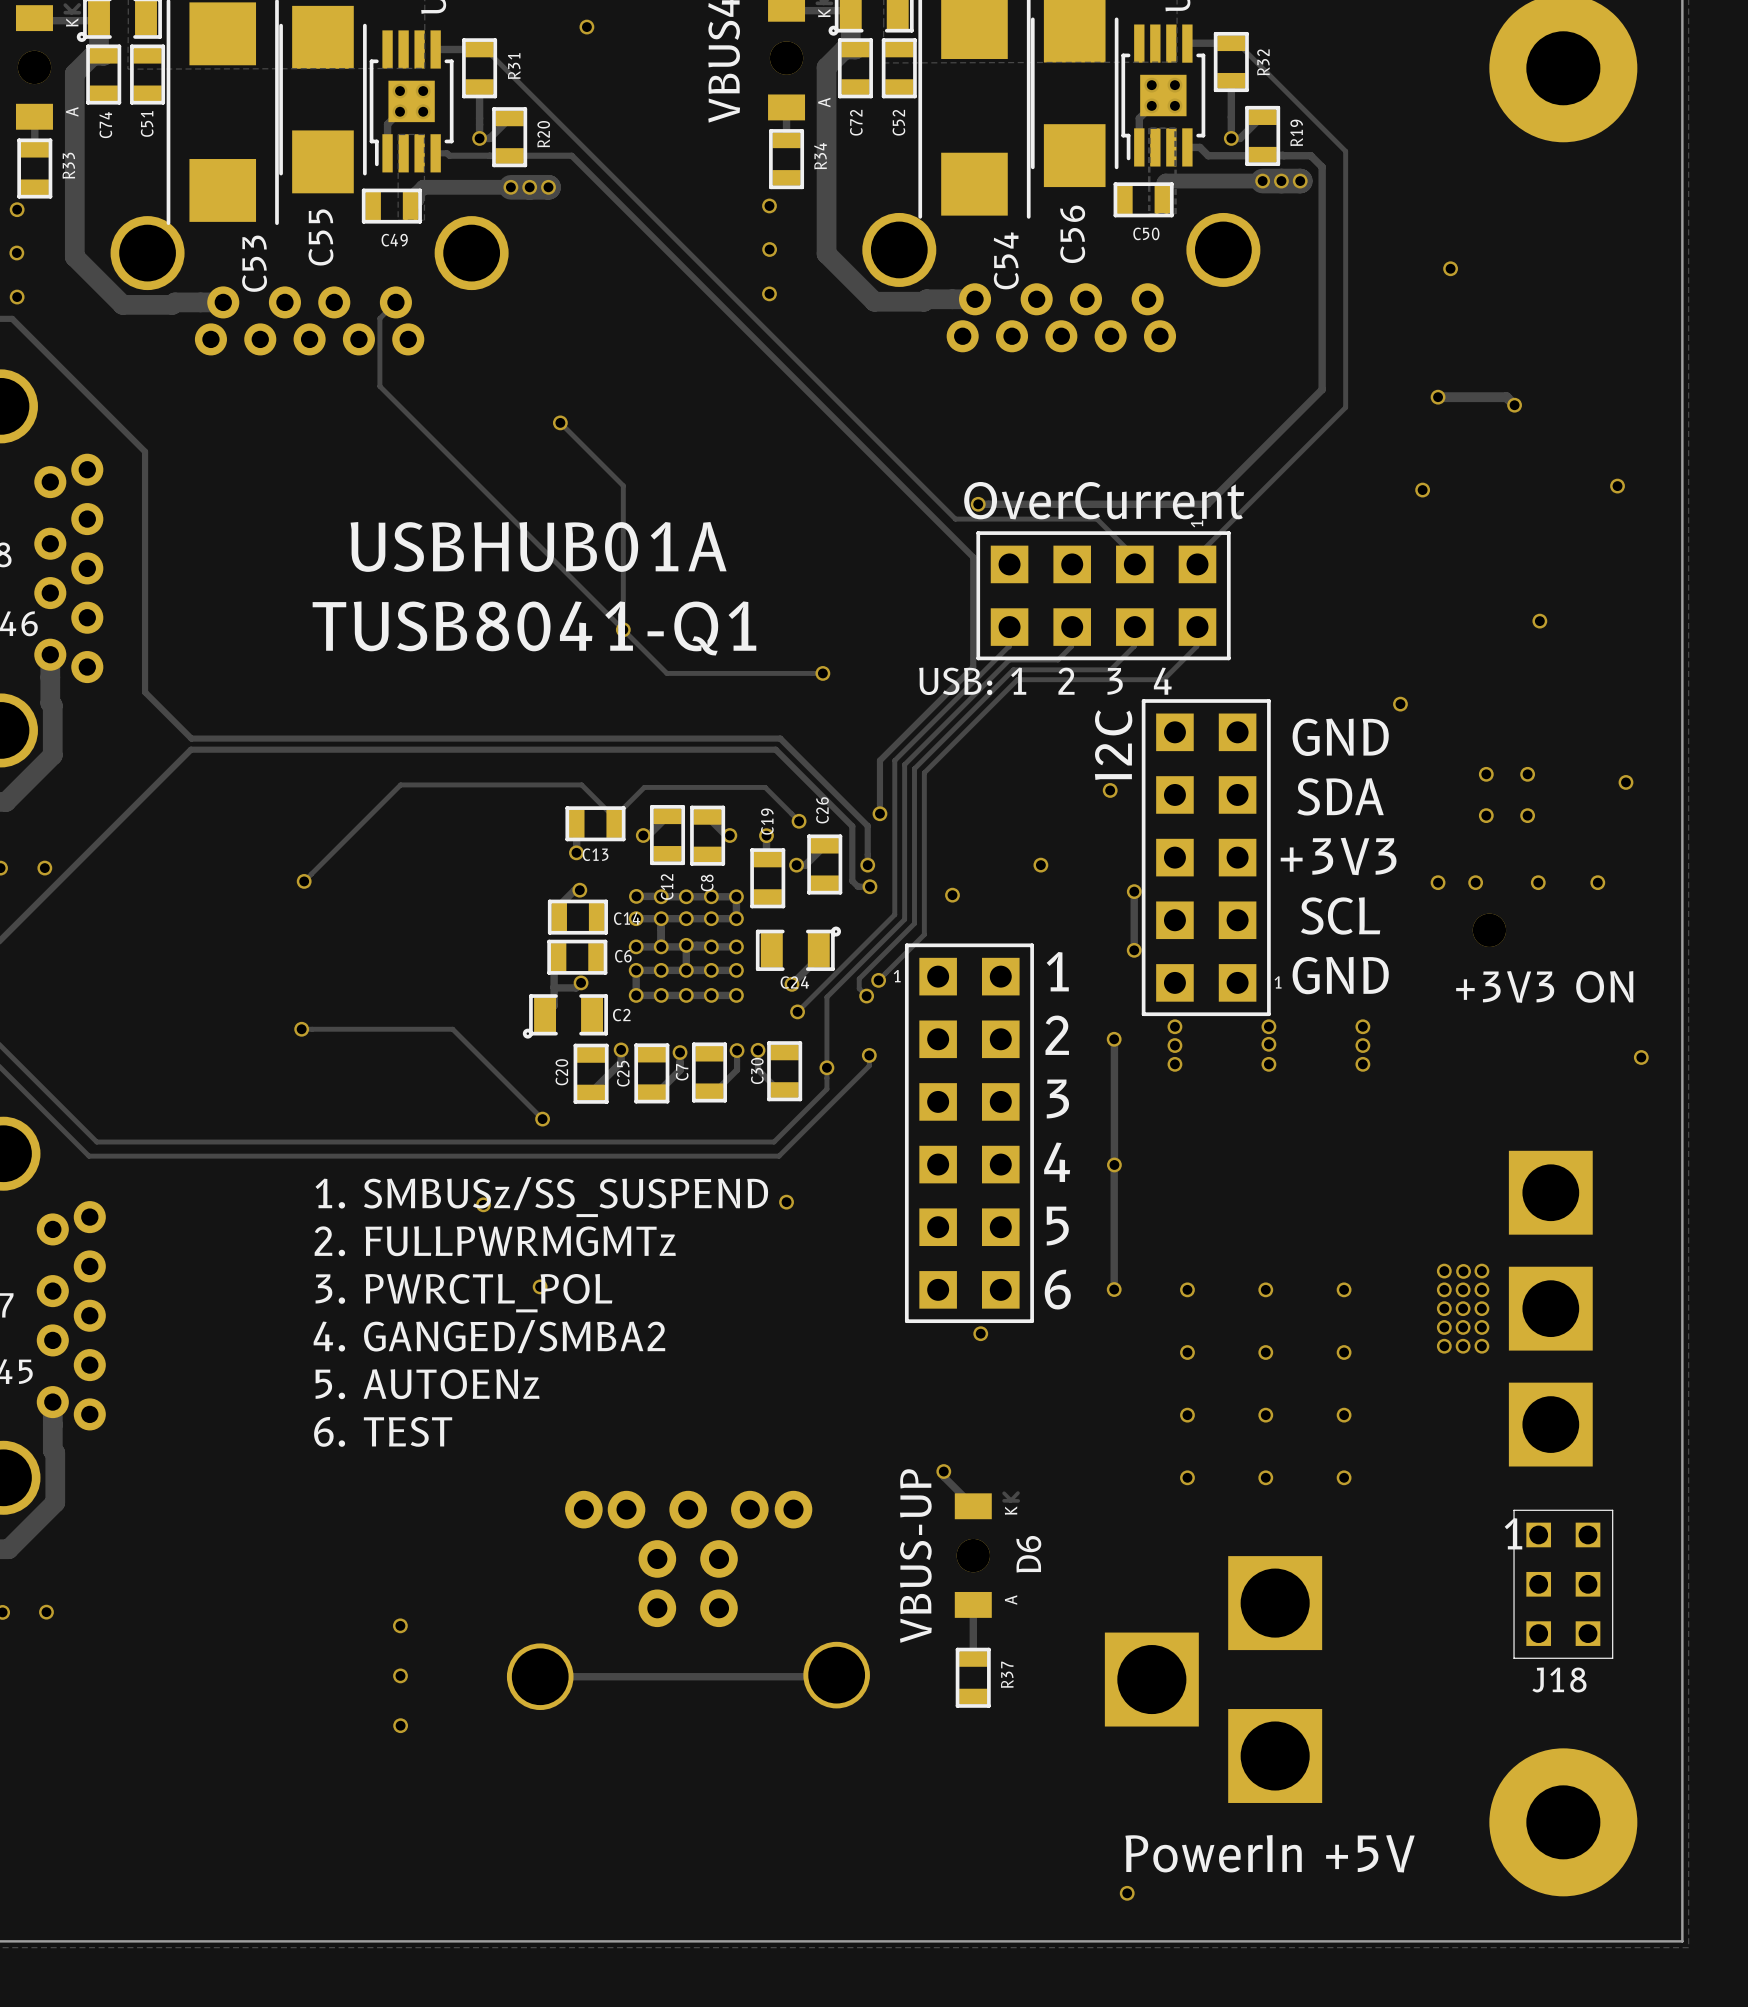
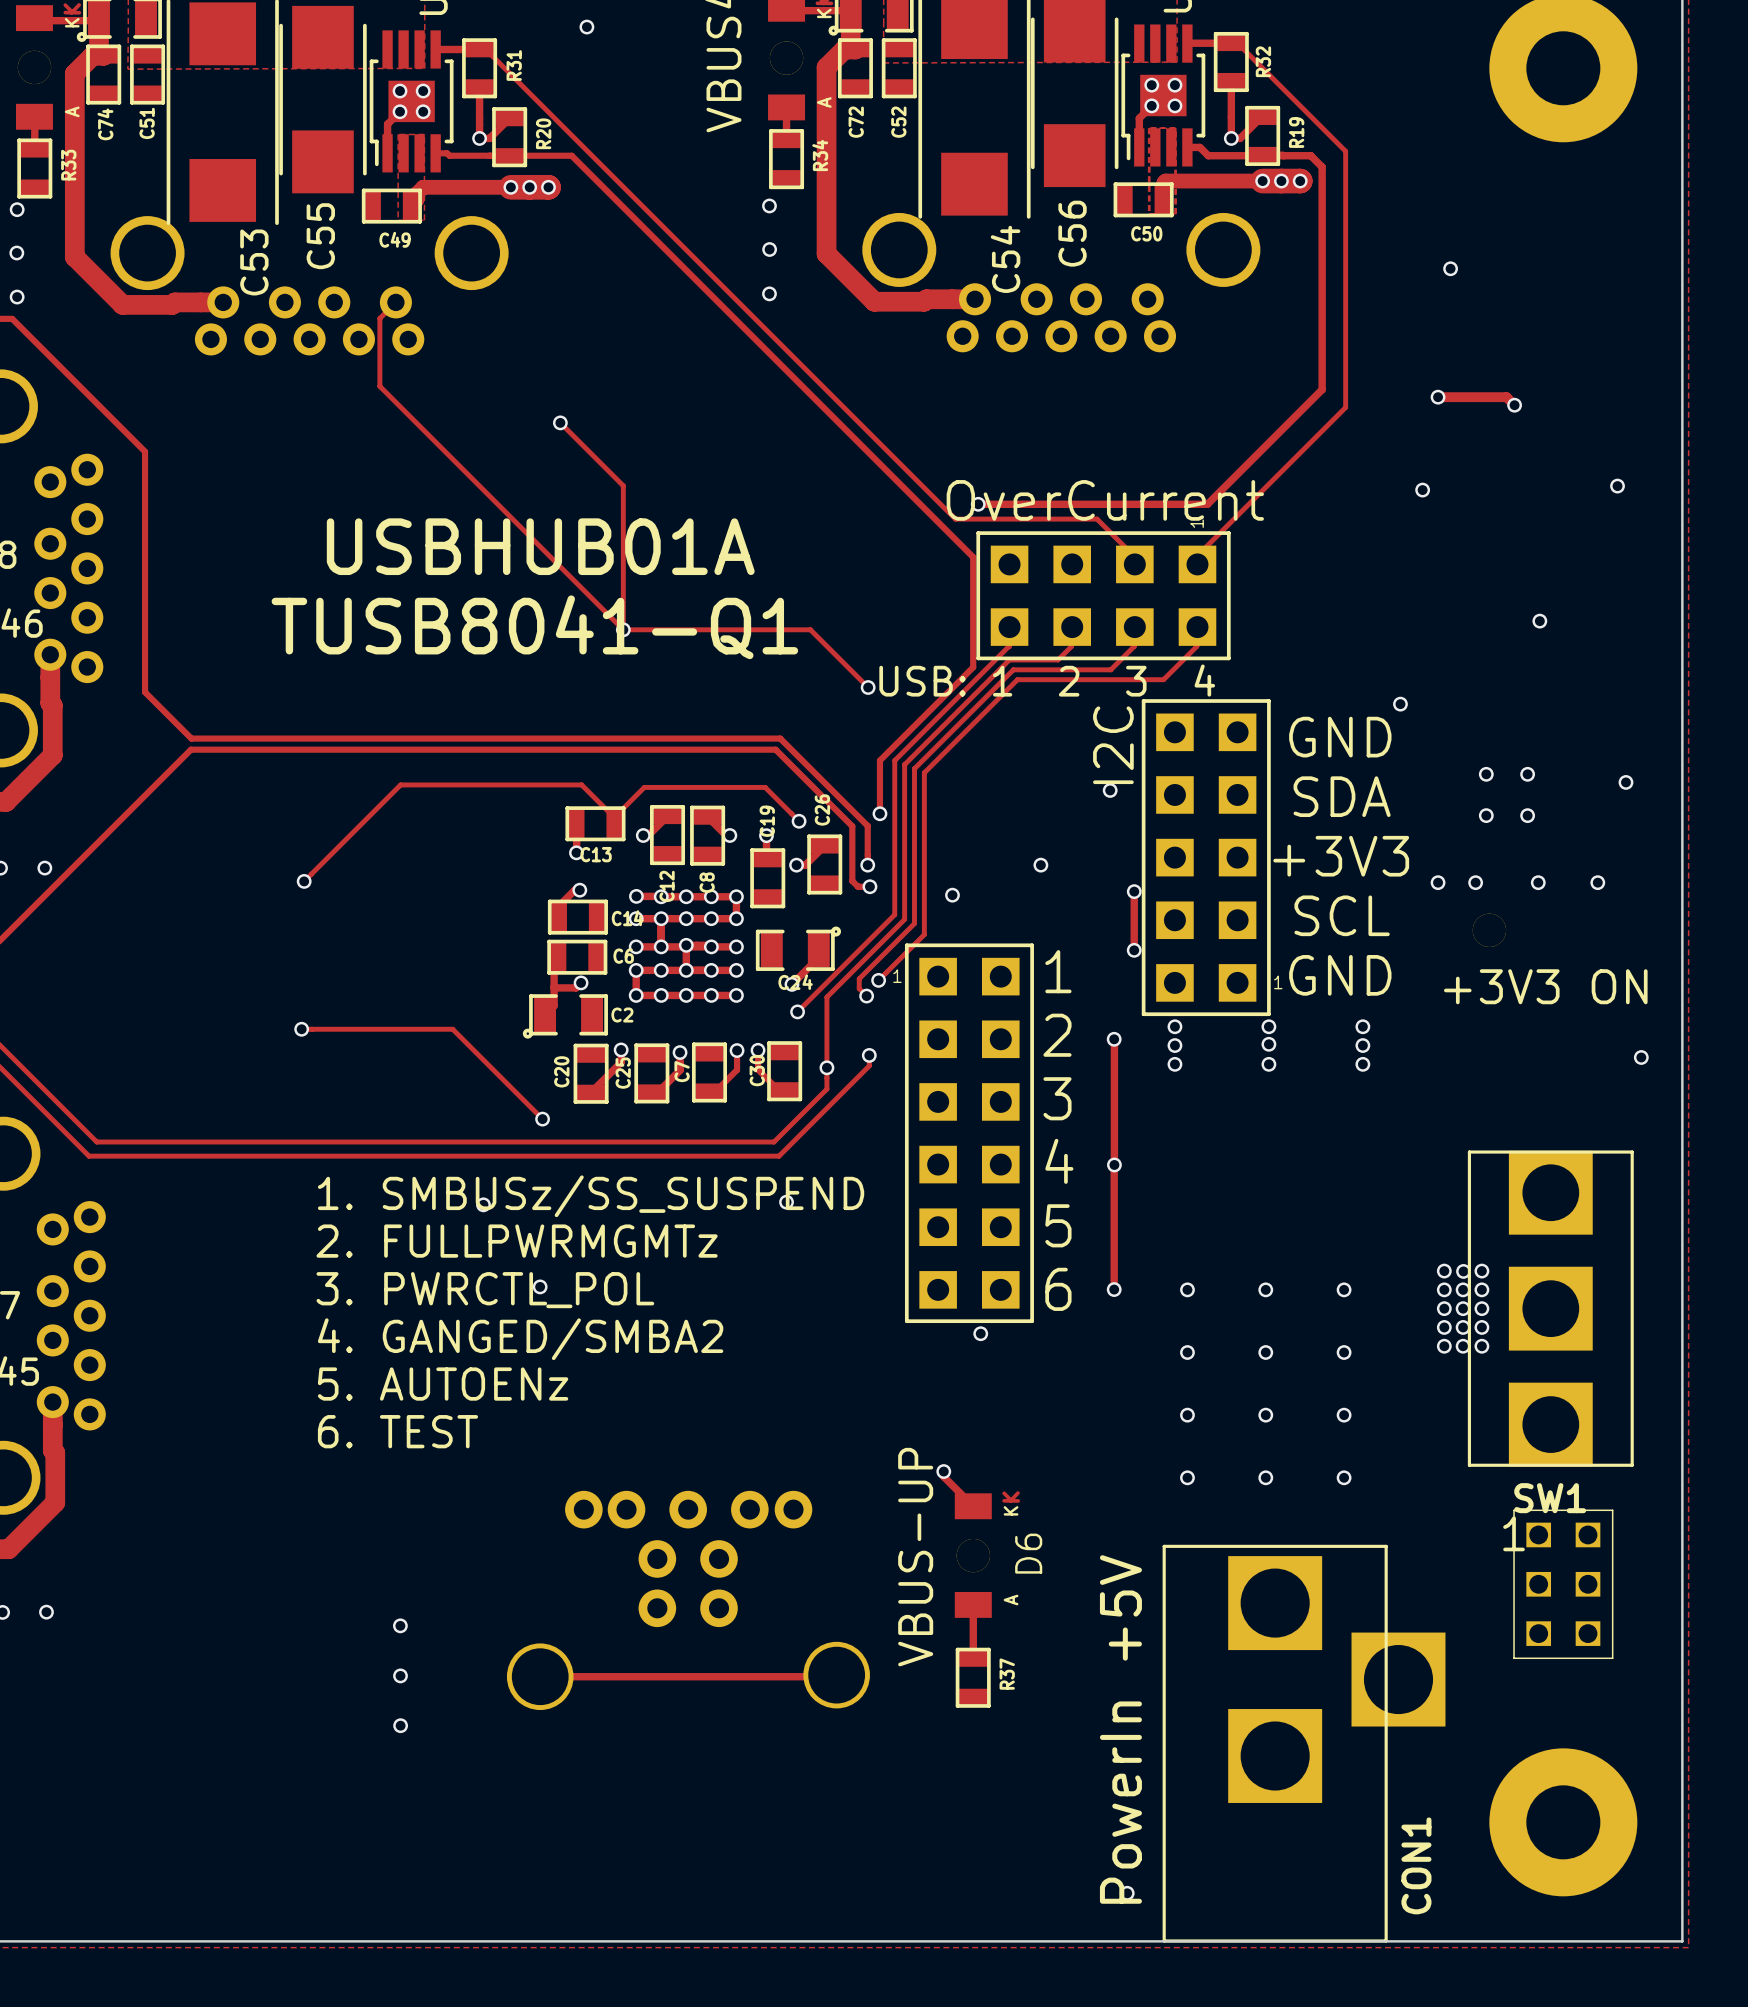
track: (623, 629) (666, 673) (822, 673) -> (623, 629) (810, 629) (868, 687)
via position: (822, 673) -> (868, 687)
SW1 side: bottom (1550, 1308) -> top (1550, 1308)
CON1 side: bottom (1213, 1679) -> top (1304, 1743)
J18 name: J18 (1559, 1679) -> none

